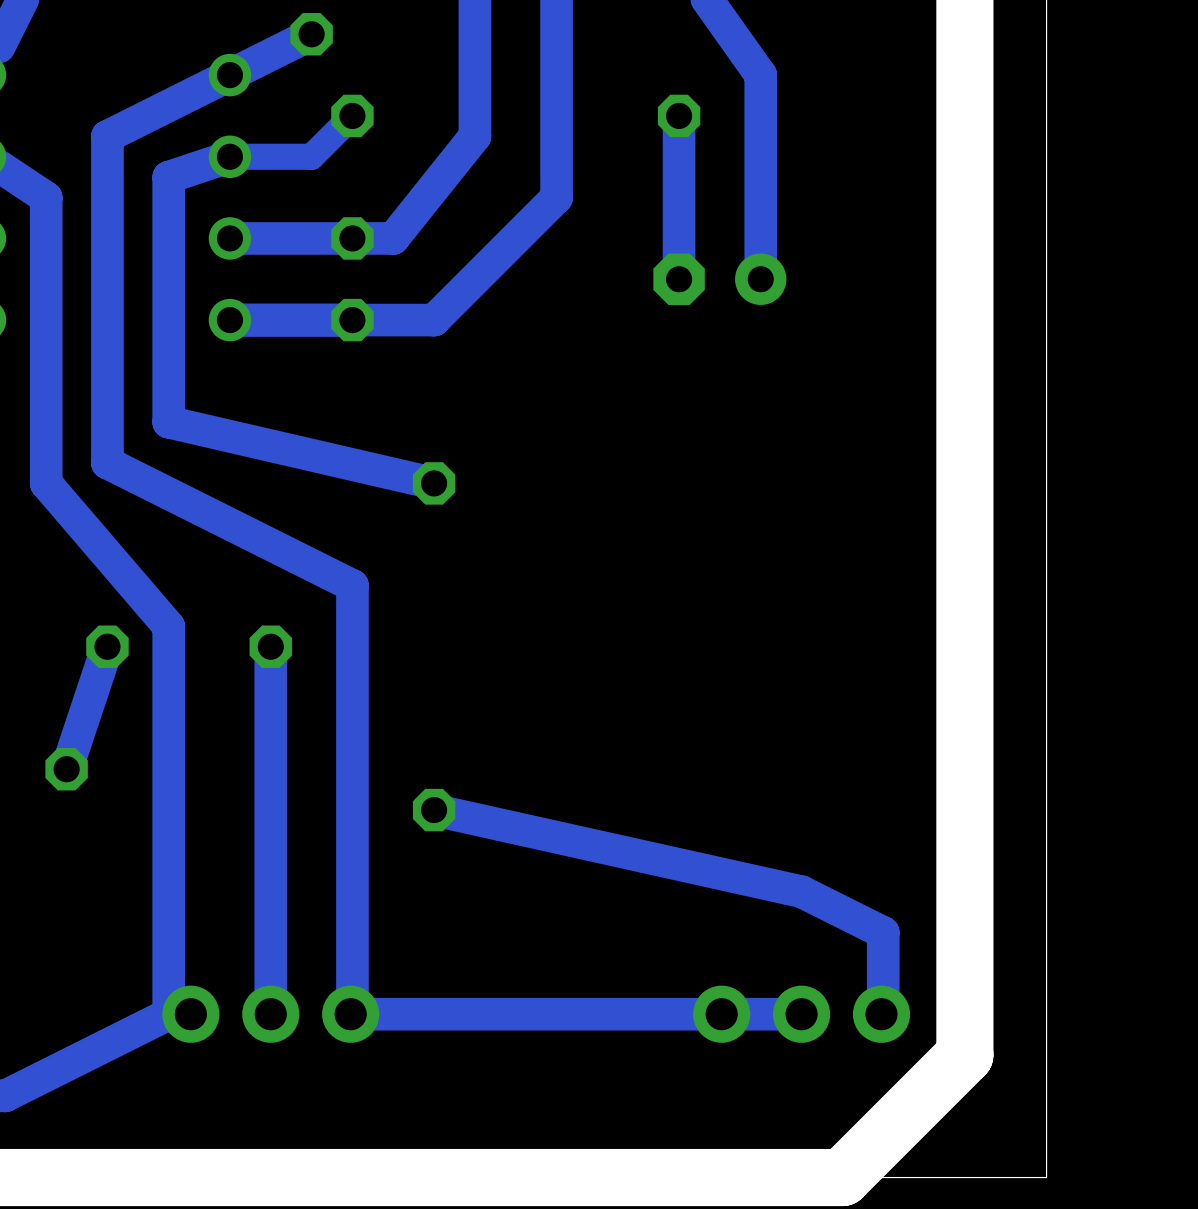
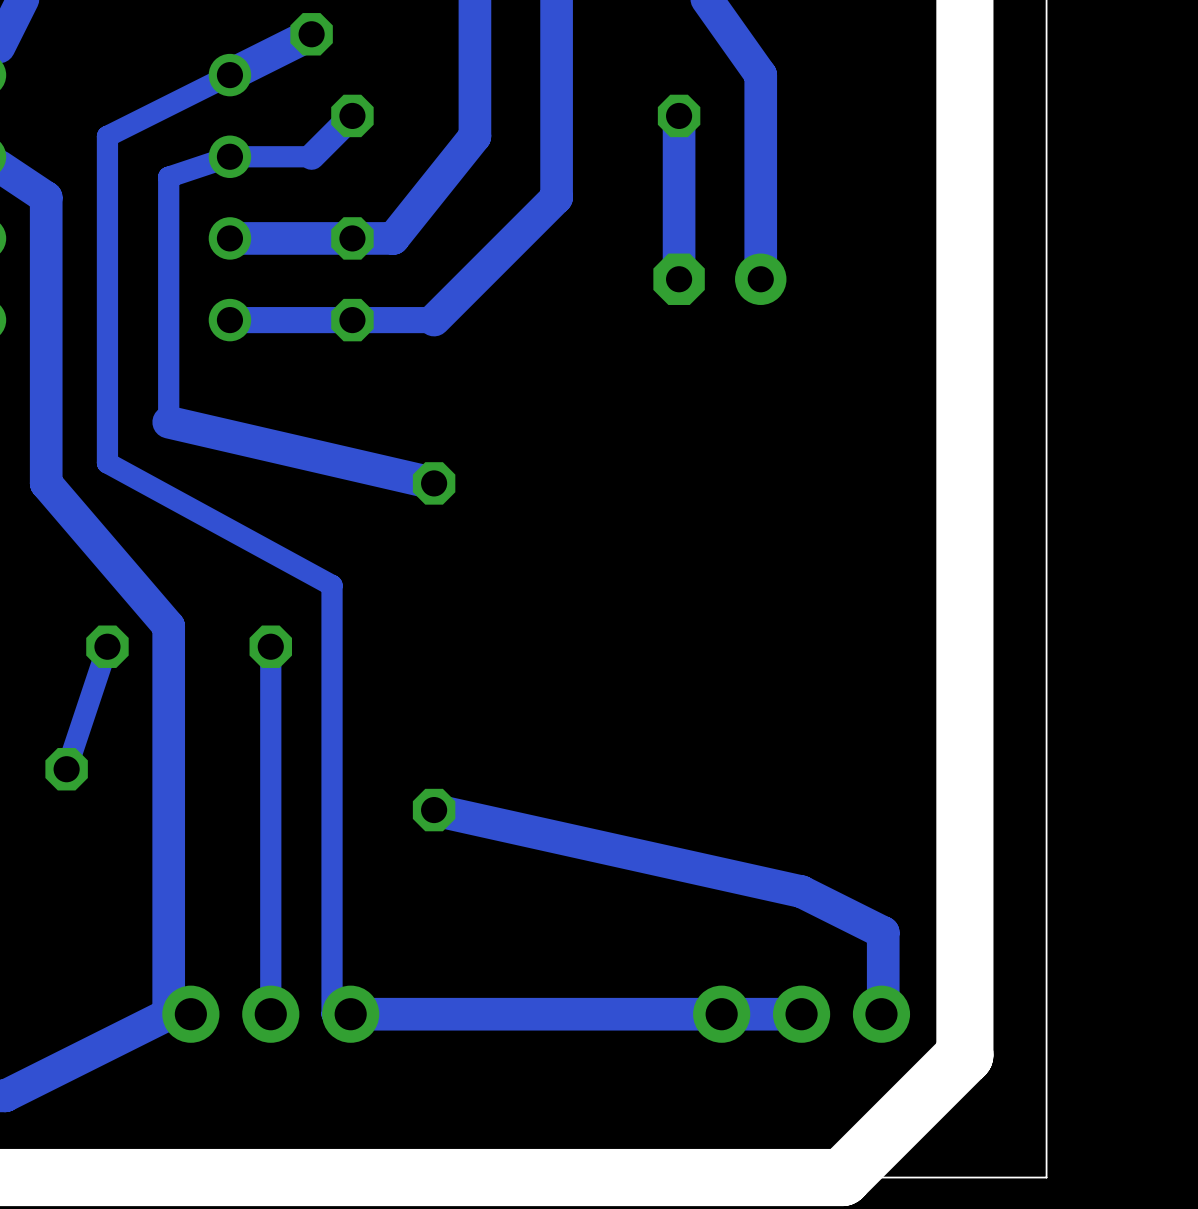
track width: thick (229, 75) (107, 136) (107, 463) -> thin (229, 75) (107, 136) (107, 463)
track width: thick (311, 156) (229, 156) (168, 177) (168, 422) -> thin (311, 156) (229, 156) (168, 177) (168, 422)
track width: thick (434, 320) (229, 320) -> thin (434, 320) (229, 320)
track: (107, 463) (352, 585) (352, 1014) -> (107, 463) (332, 585) (332, 1014) (350, 1014)
track width: thick (107, 646) (66, 769) -> thin (107, 646) (66, 769)
track width: thick (270, 646) (270, 1014) -> thin (270, 646) (270, 1014)

